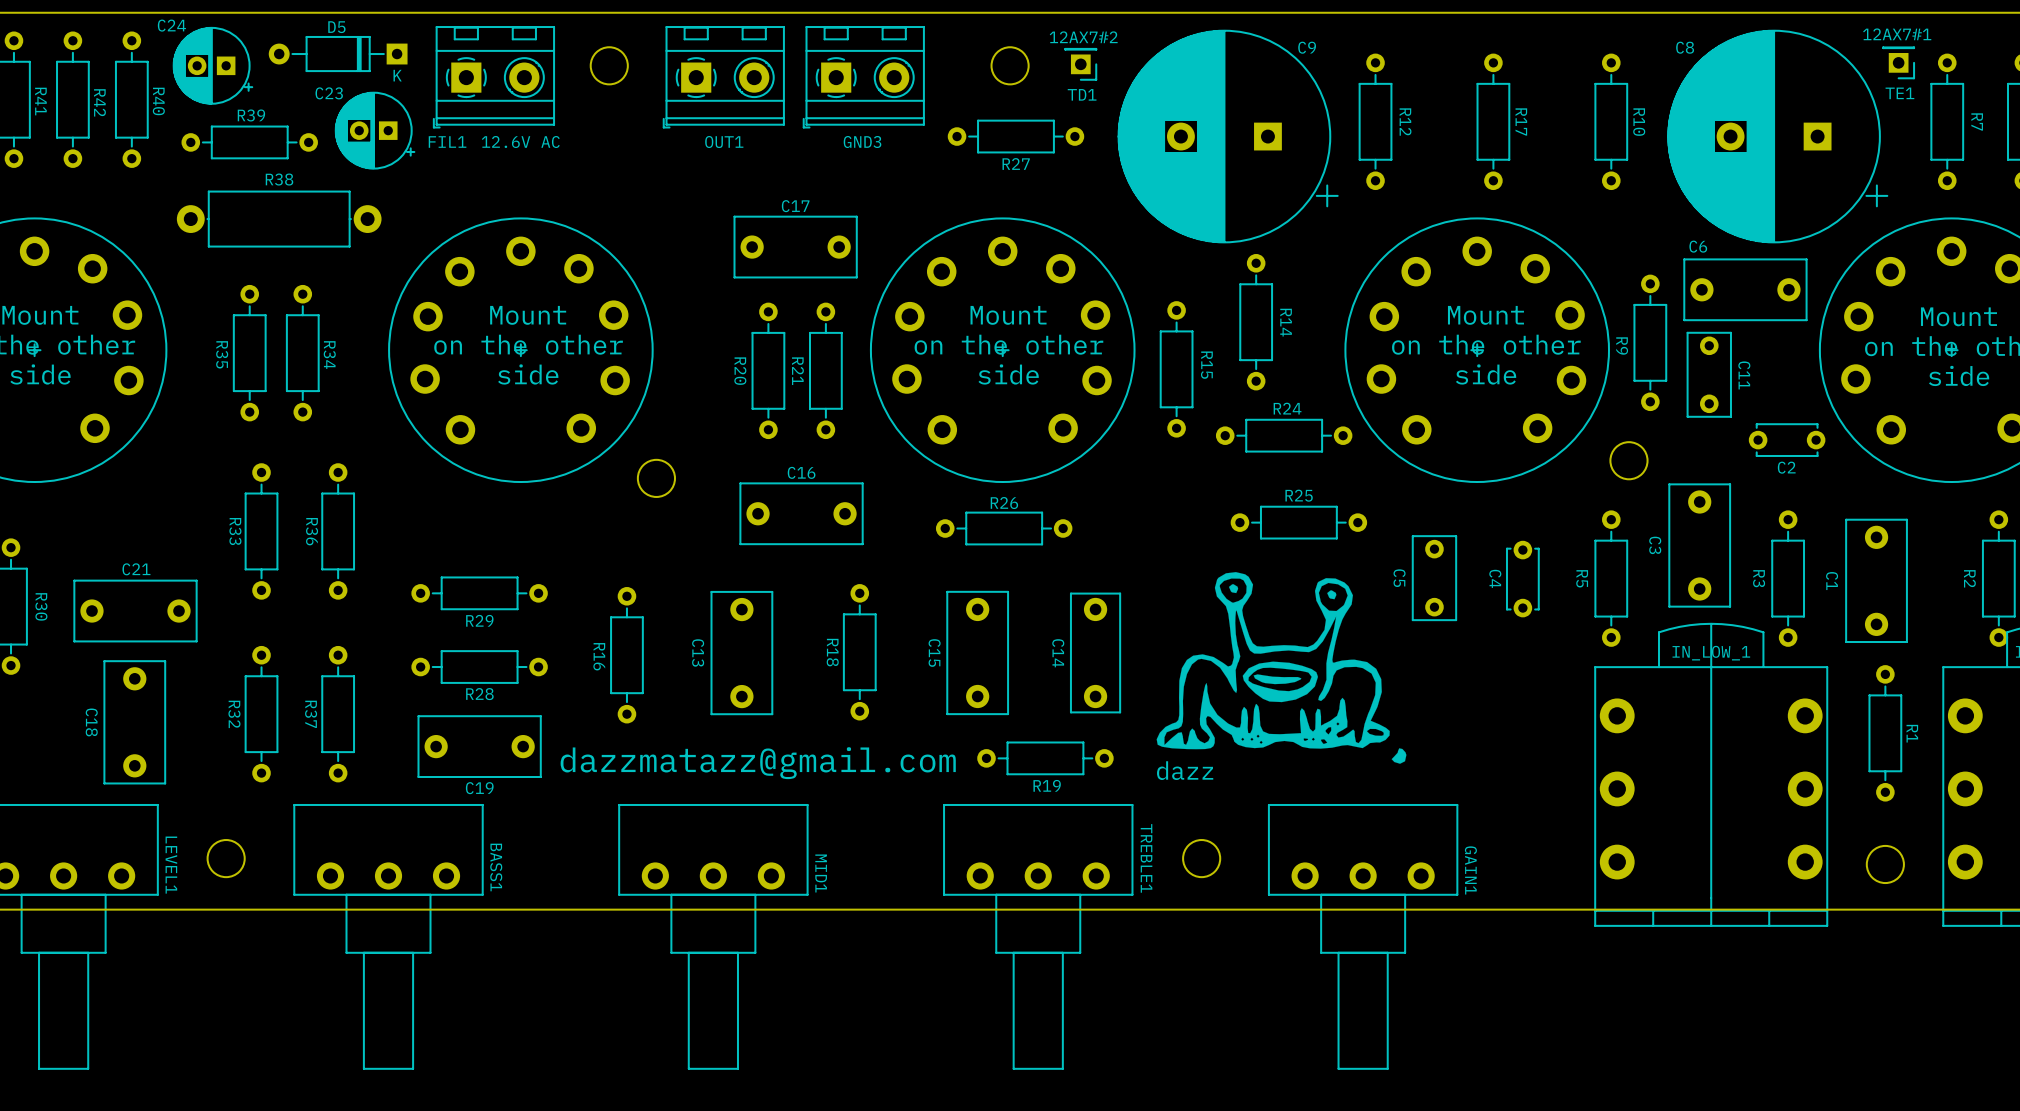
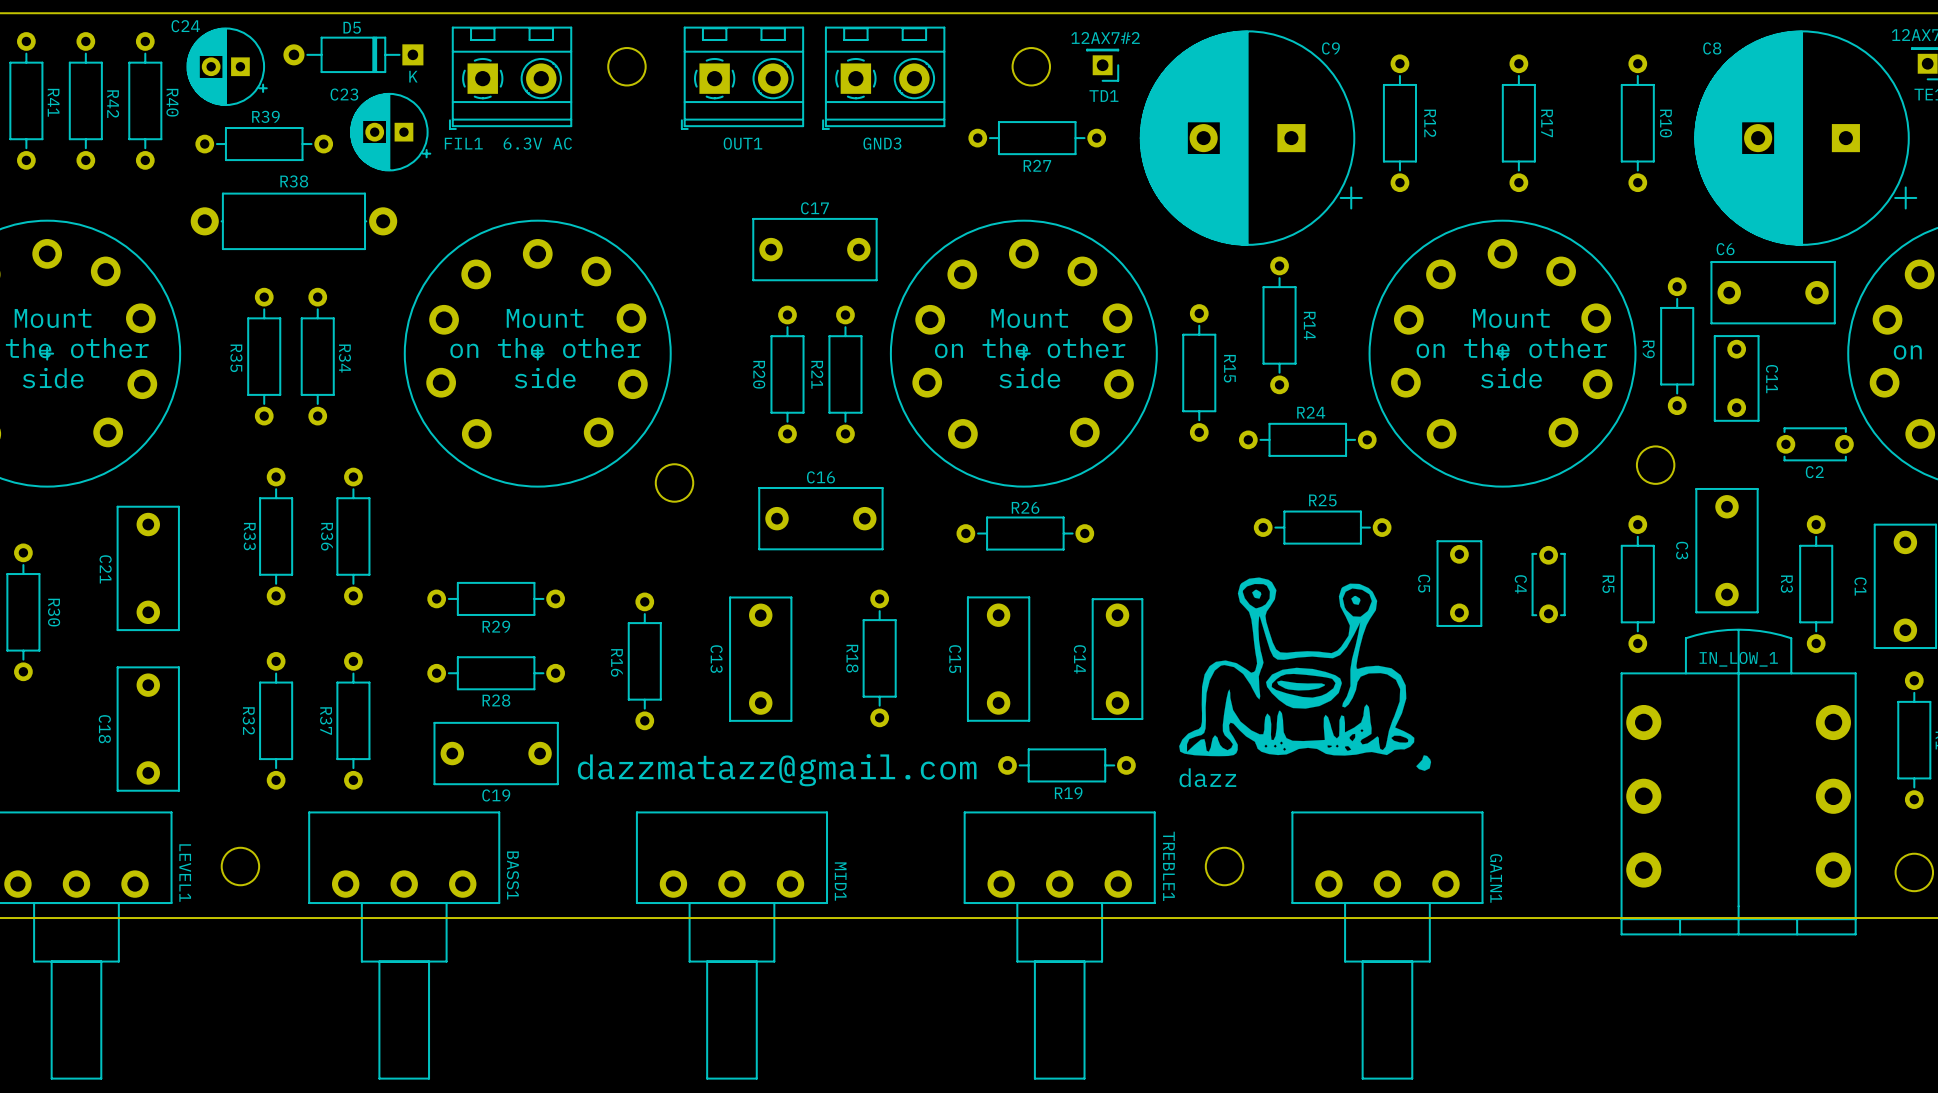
text: 12.6V AC (520, 142) -> 6.3V AC (537, 143)
C21 name position: C21 (136, 569) -> C21 (105, 569)
C21 rotation: 0° (135, 611) -> 90° clockwise (148, 568)

